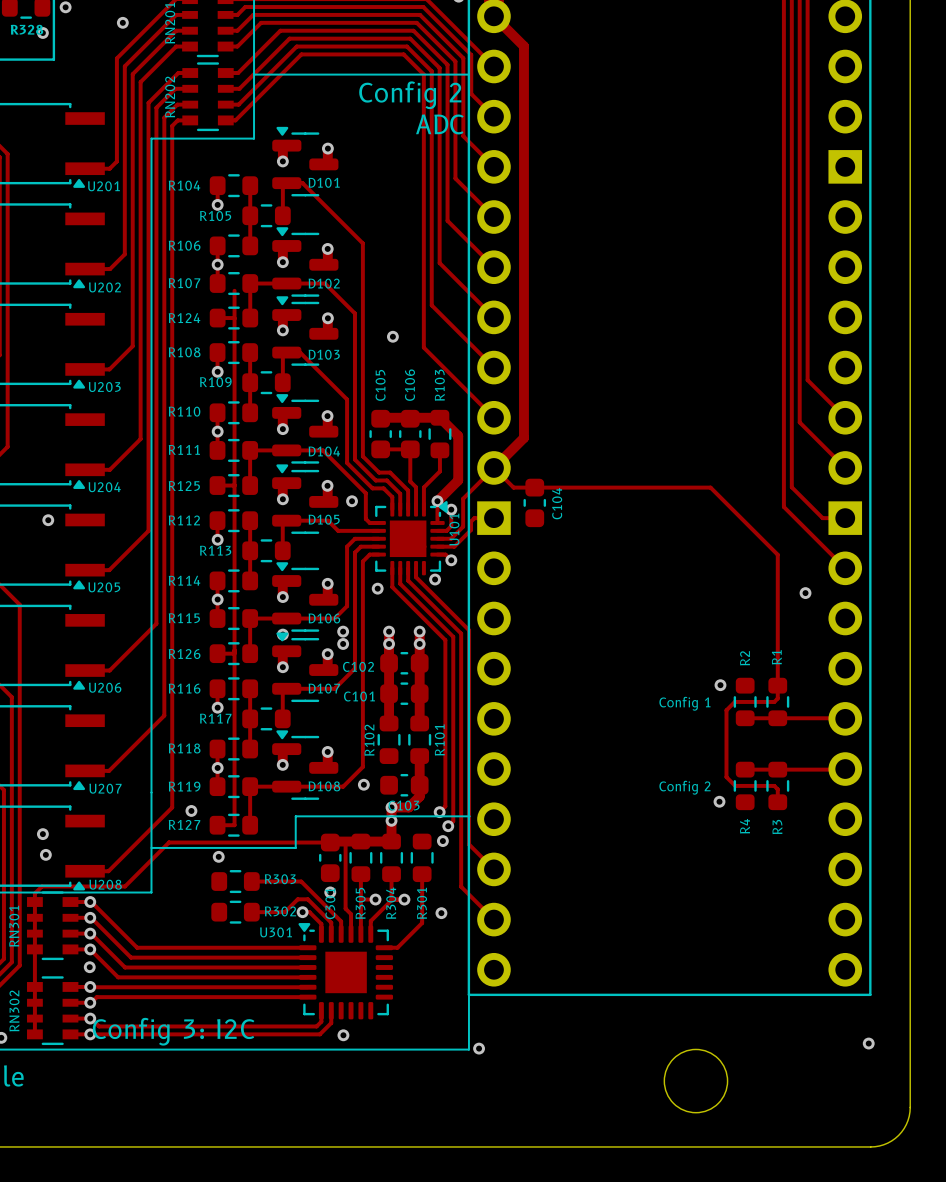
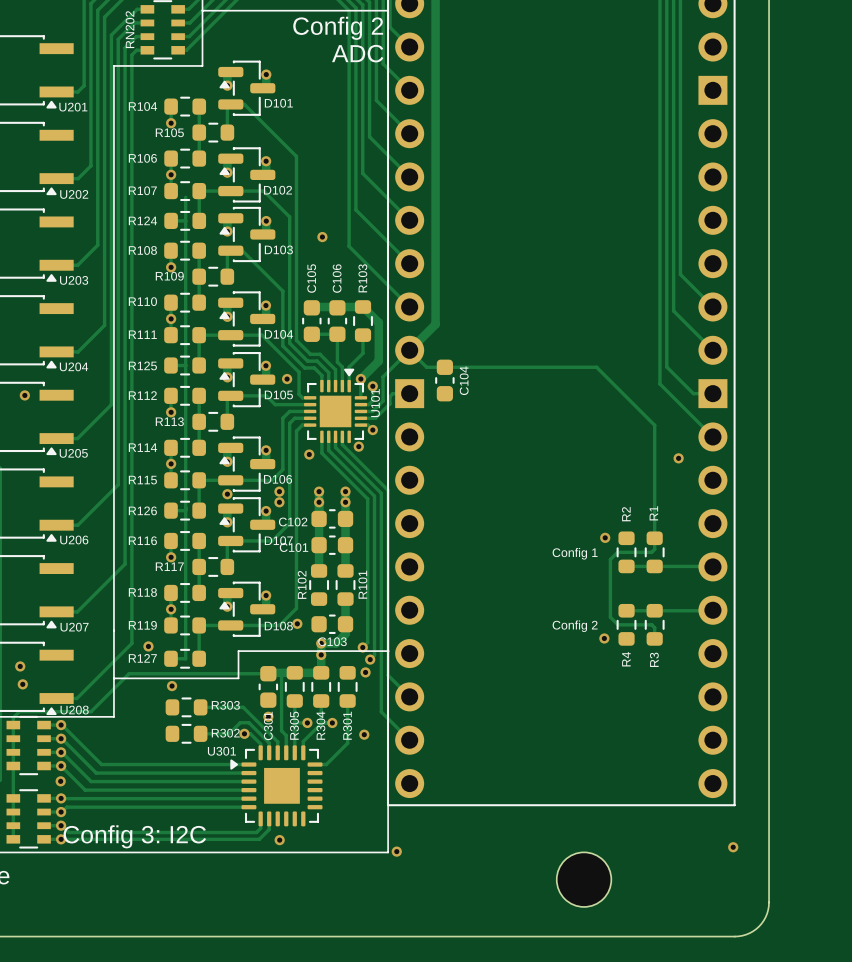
D101 footprint: [272, 126, 339, 197] -> [218, 60, 276, 116]
D102 footprint: [272, 227, 339, 297] -> [218, 147, 276, 203]
D103 footprint: [272, 296, 339, 366] -> [218, 206, 276, 263]
D104 footprint: [272, 394, 339, 464] -> [218, 291, 276, 347]
D105 footprint: [272, 464, 339, 534] -> [218, 351, 276, 408]
U101 footprint: [371, 501, 448, 576] -> [303, 368, 368, 444]
D106 footprint: [272, 562, 339, 632] -> [218, 436, 276, 492]
D107 footprint: [272, 632, 339, 703] -> [218, 497, 276, 553]
D108 footprint: [272, 730, 339, 800] -> [218, 581, 276, 637]
U301 footprint: [298, 923, 394, 1020] -> [230, 745, 323, 827]

